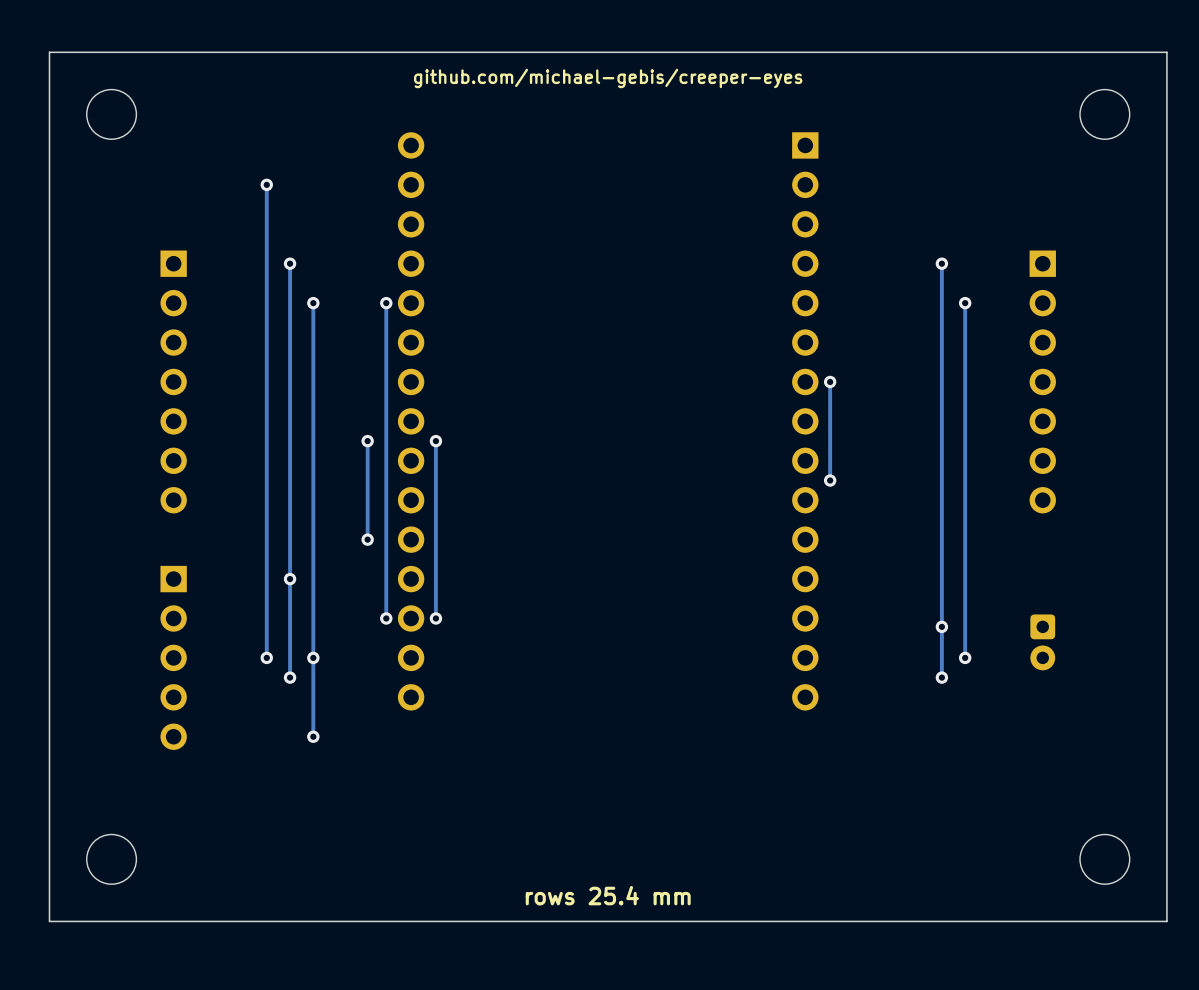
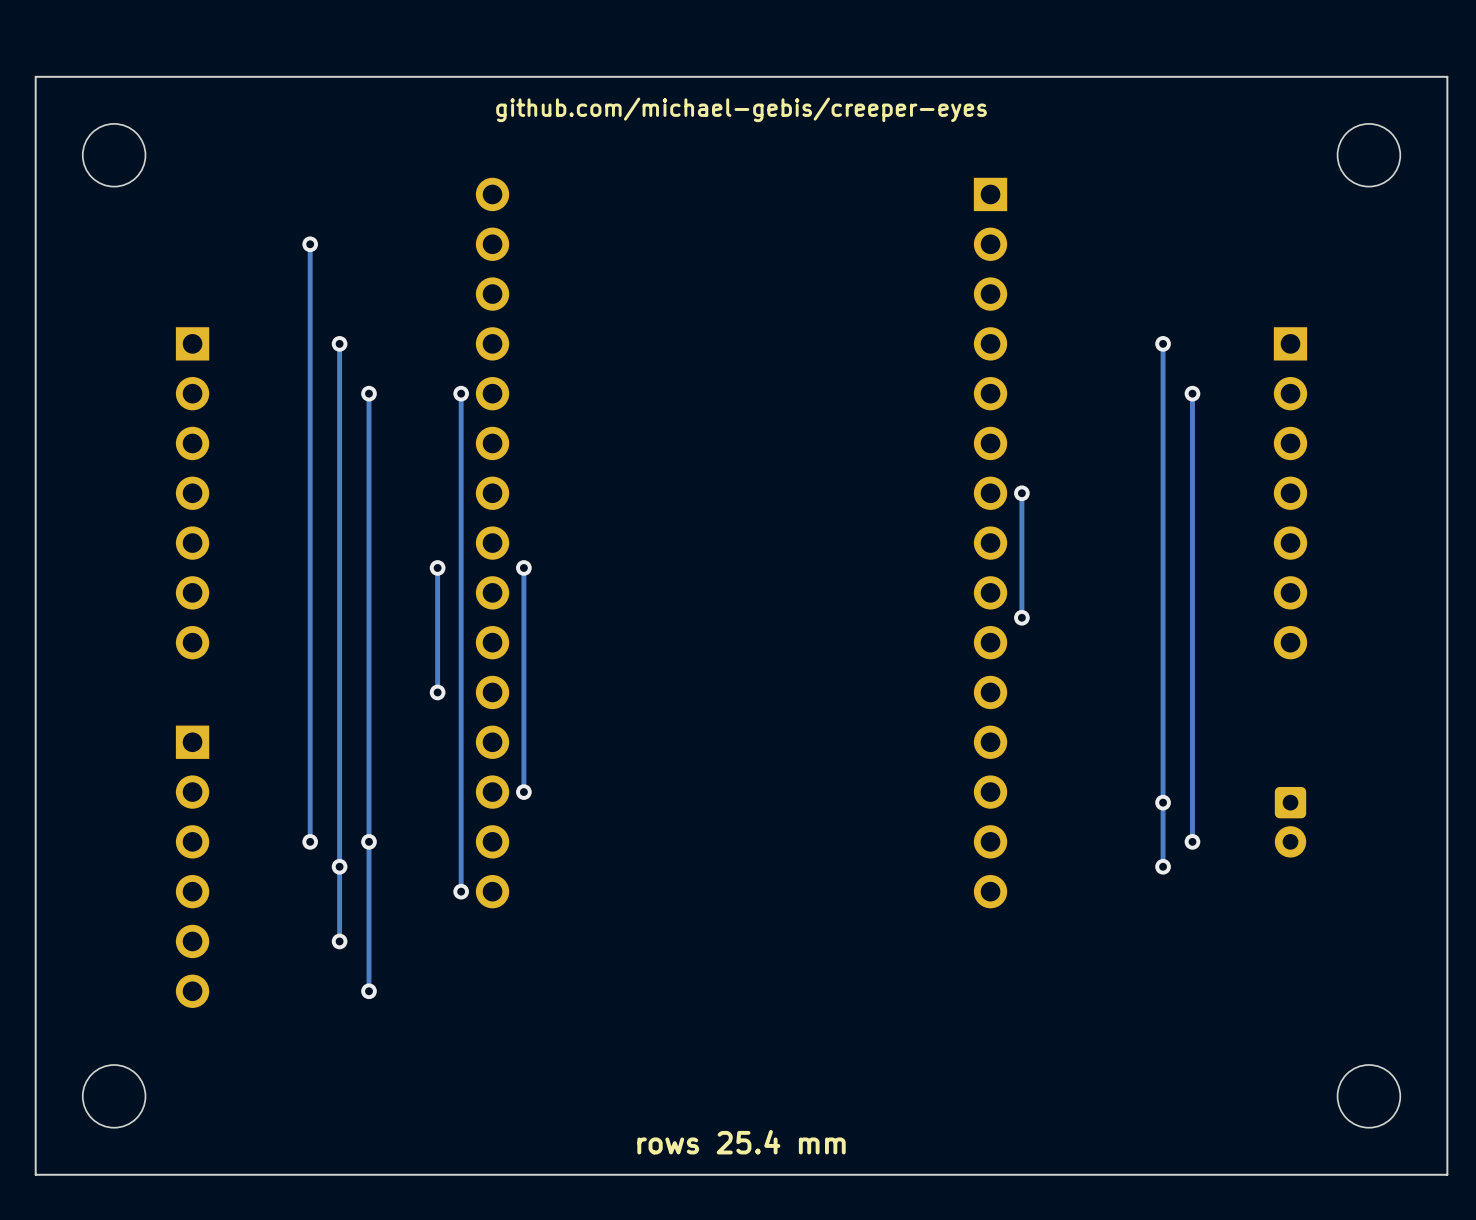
via: (290, 579) -> none
track: none -> (461, 792) (461, 891)
via: (386, 618) -> none
part: none -> (192, 866)
track: none -> (339, 866) (339, 941)
via: none -> (461, 891)
via: none -> (339, 941)
track: none -> (369, 941) (369, 991)
via: (313, 736) -> none
via: none -> (369, 991)

